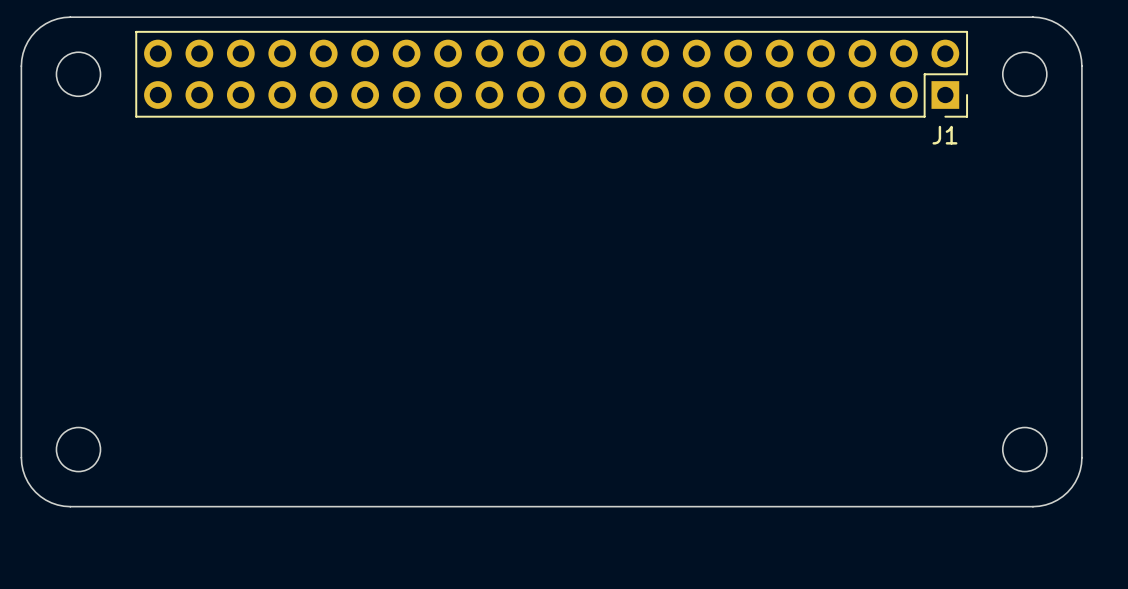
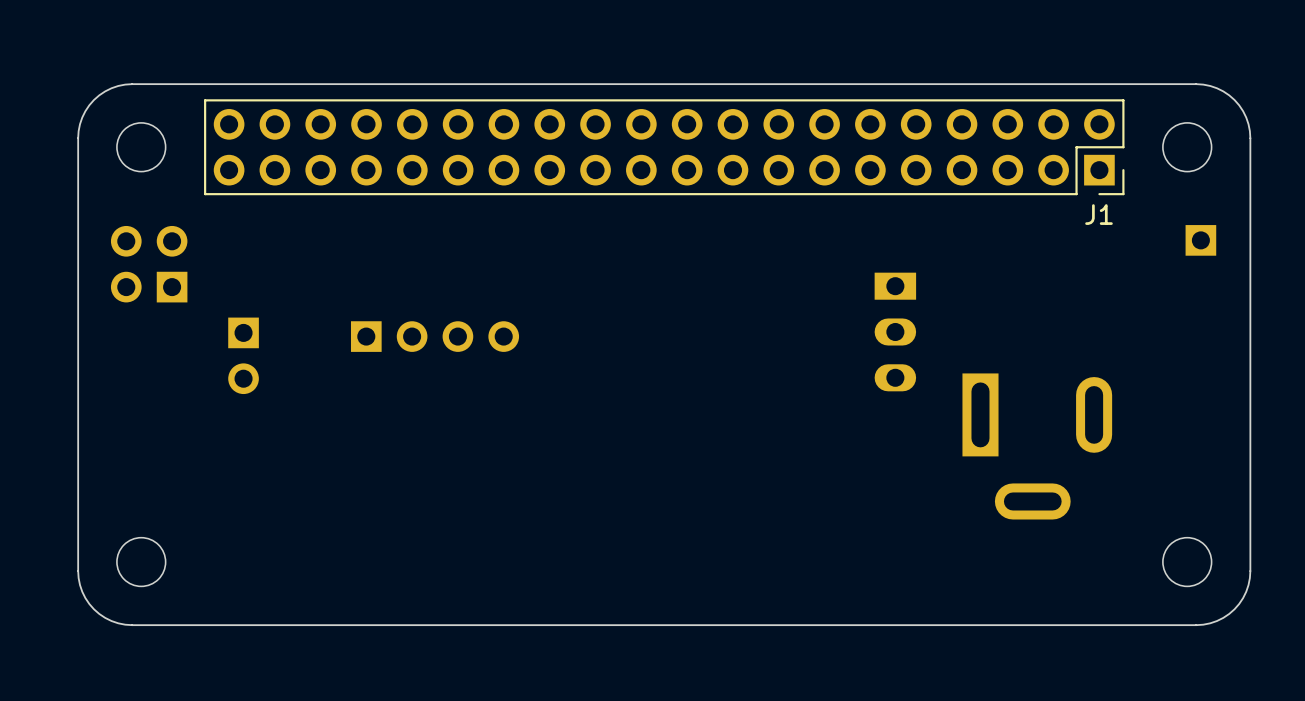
part: none -> (1200, 240)
part: none -> (149, 264)
part: none -> (895, 331)
part: none -> (435, 336)
part: none -> (243, 355)
part: none -> (1037, 446)

